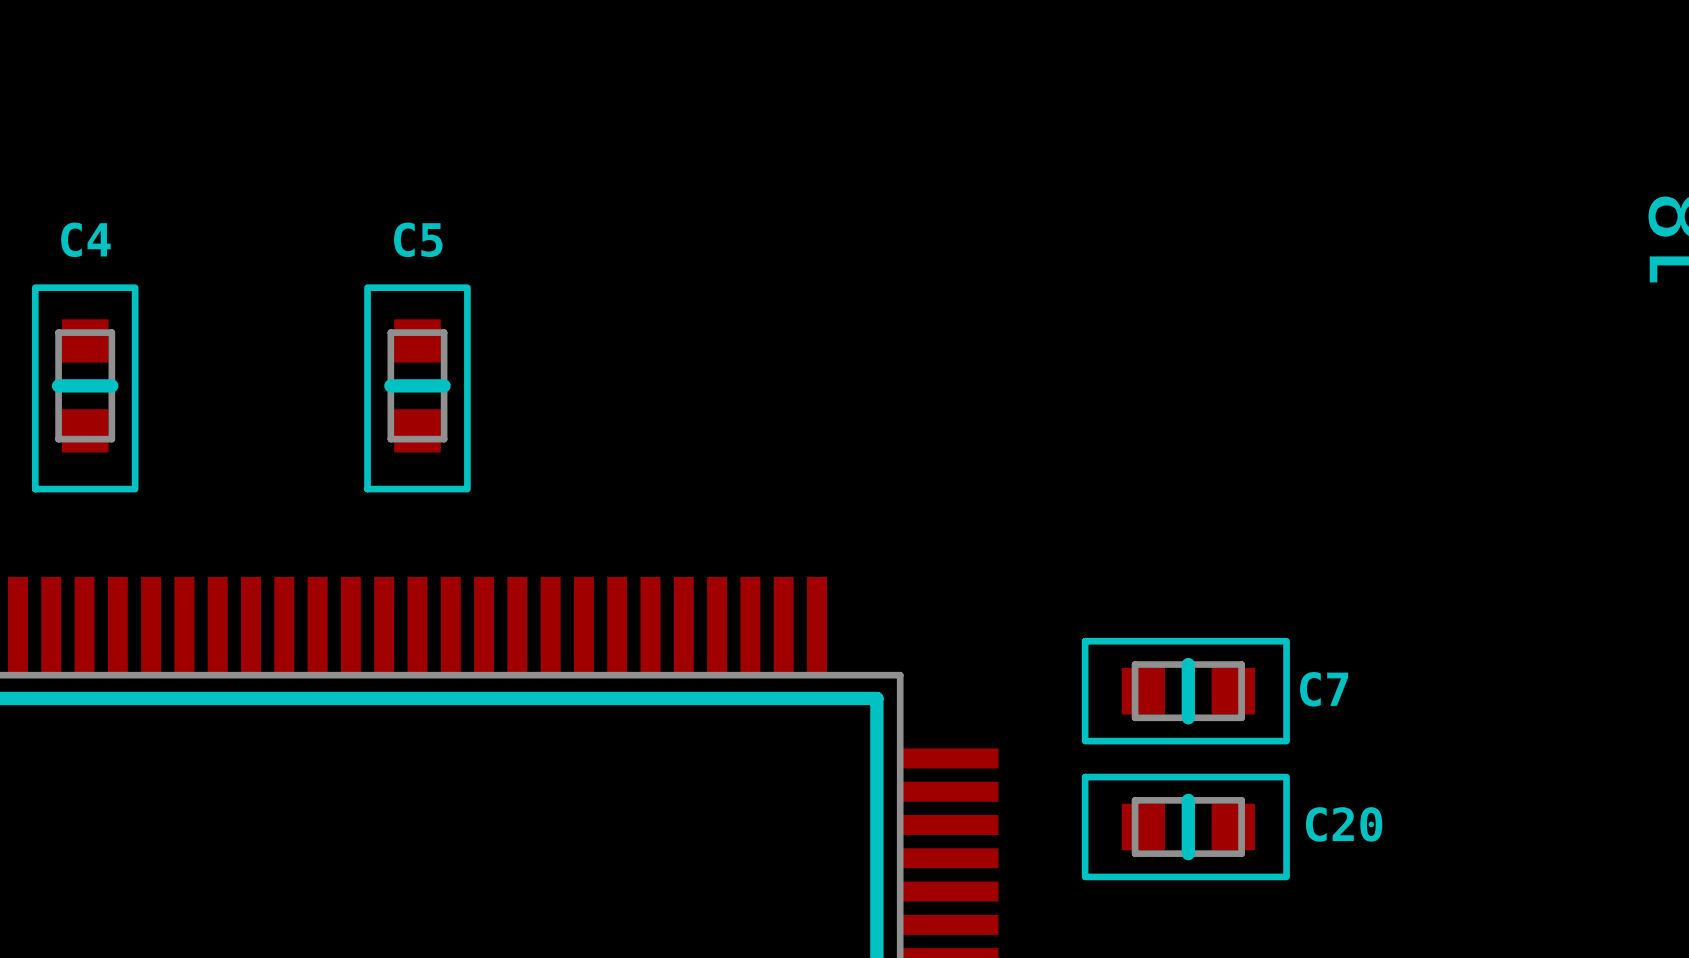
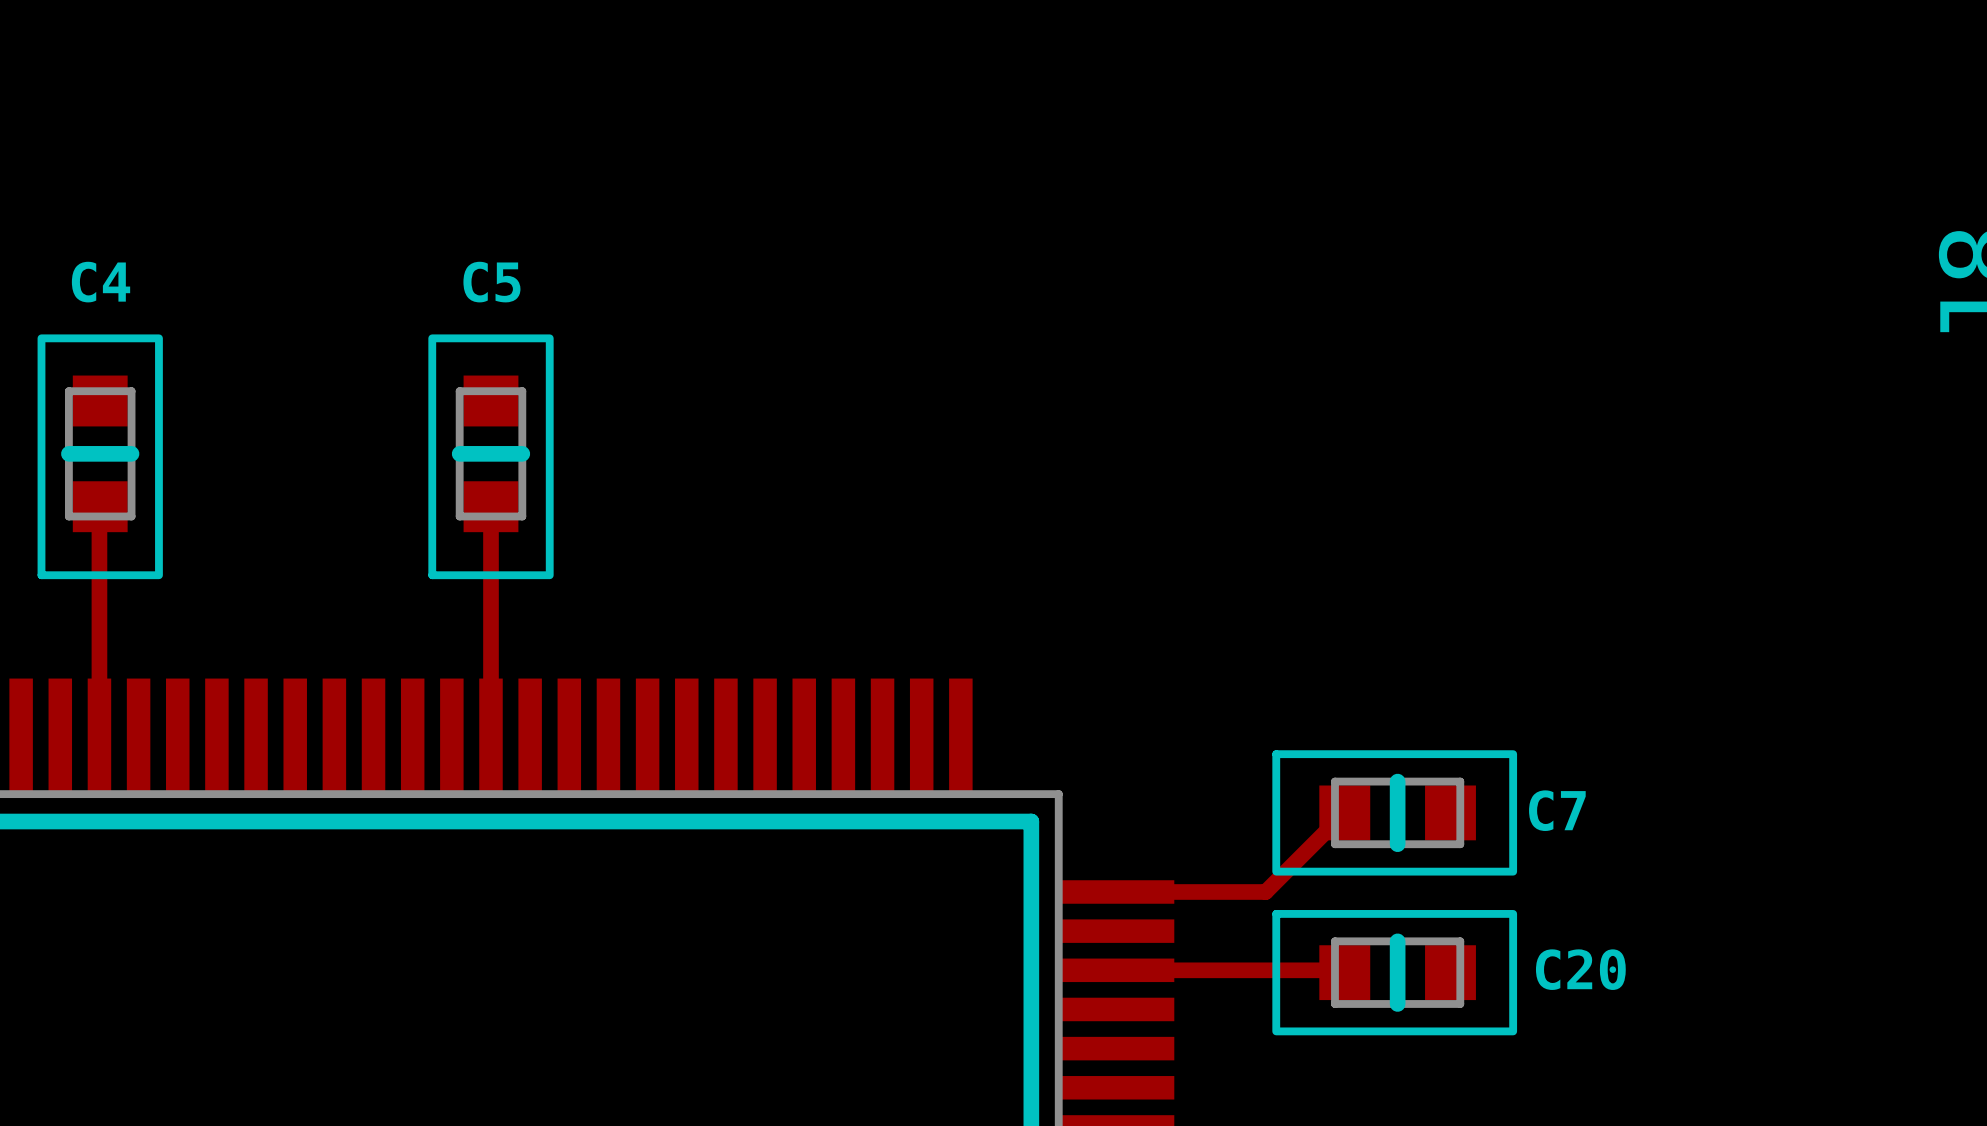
track: none -> (490, 506) (490, 736)
track: none -> (99, 507) (99, 736)
track: none -> (1344, 812) (1265, 891) (1116, 891)
track: none -> (1116, 970) (1342, 970) (1344, 972)

